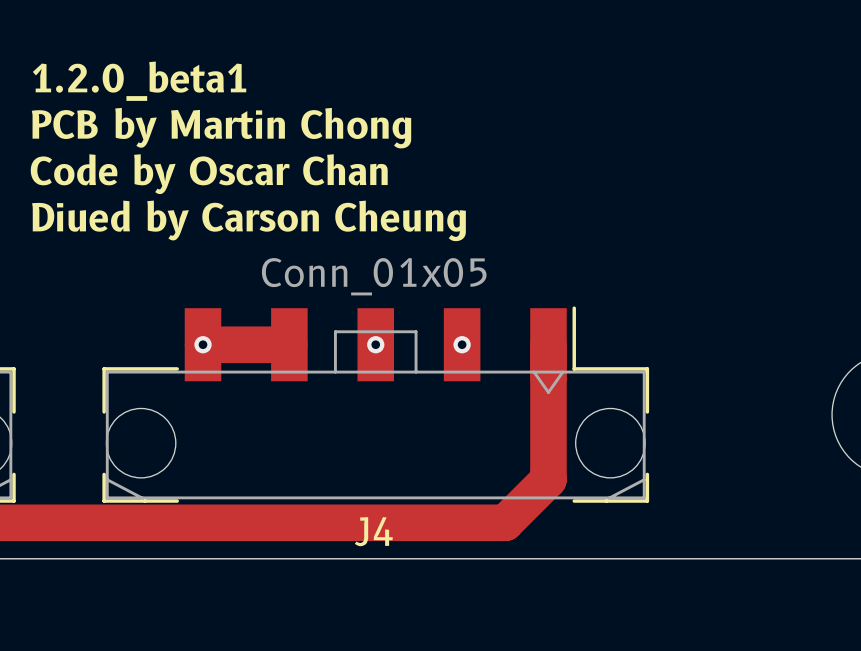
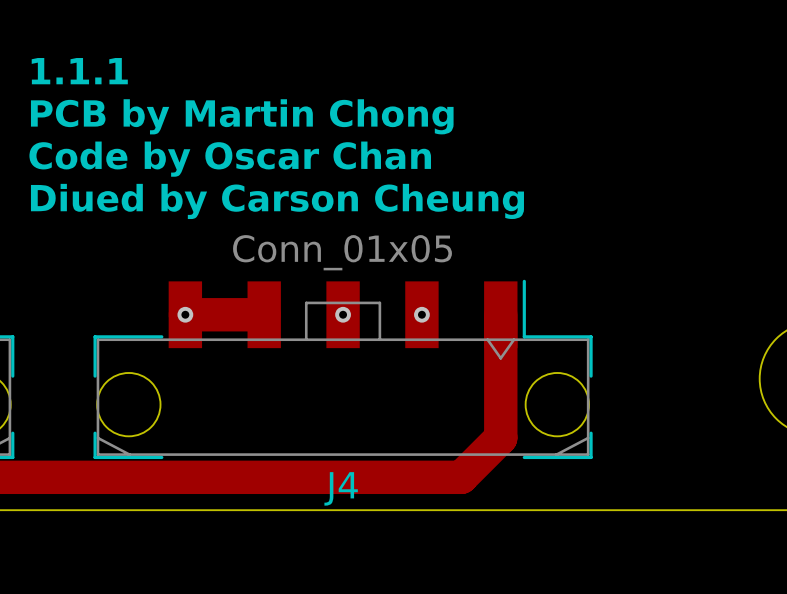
text: 1.2.0_beta1 (139, 81) -> 1.1.1 (79, 71)

